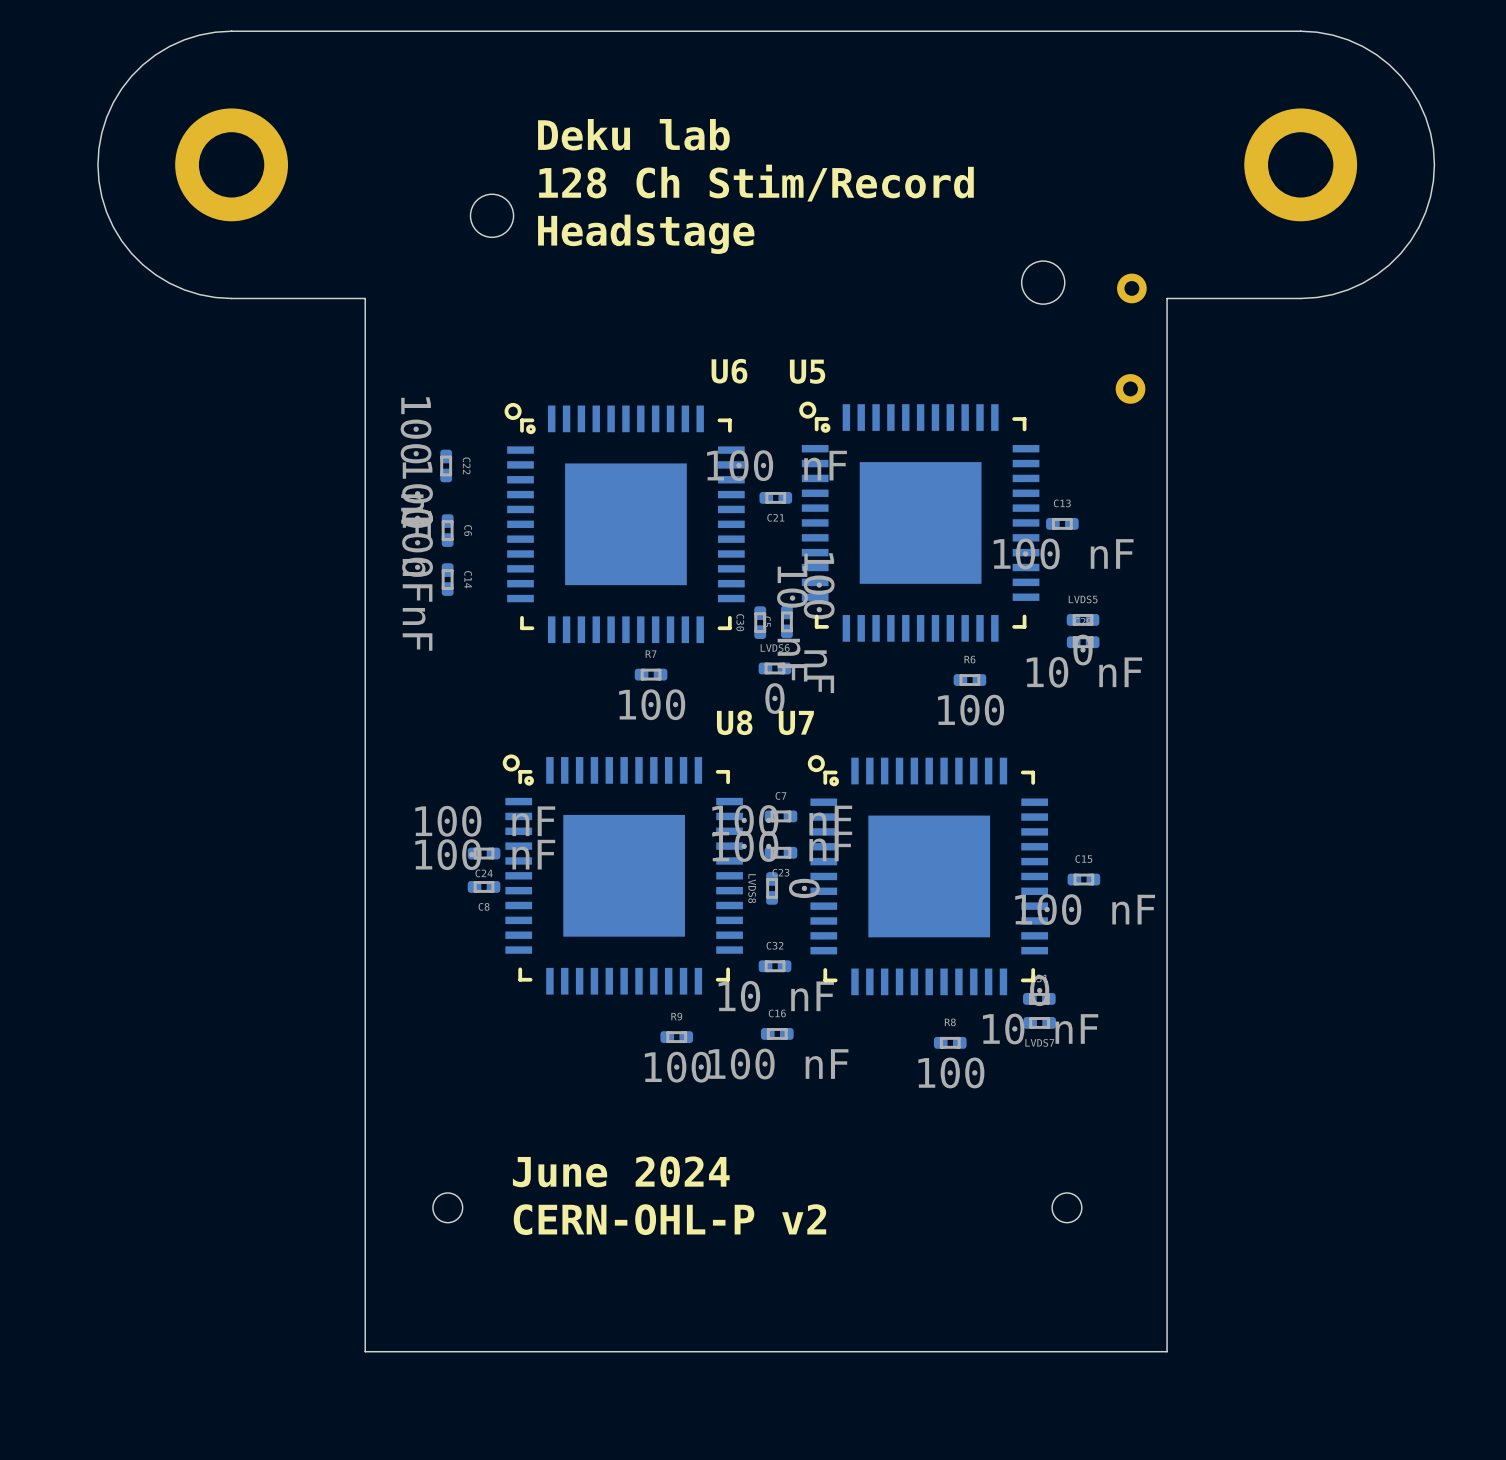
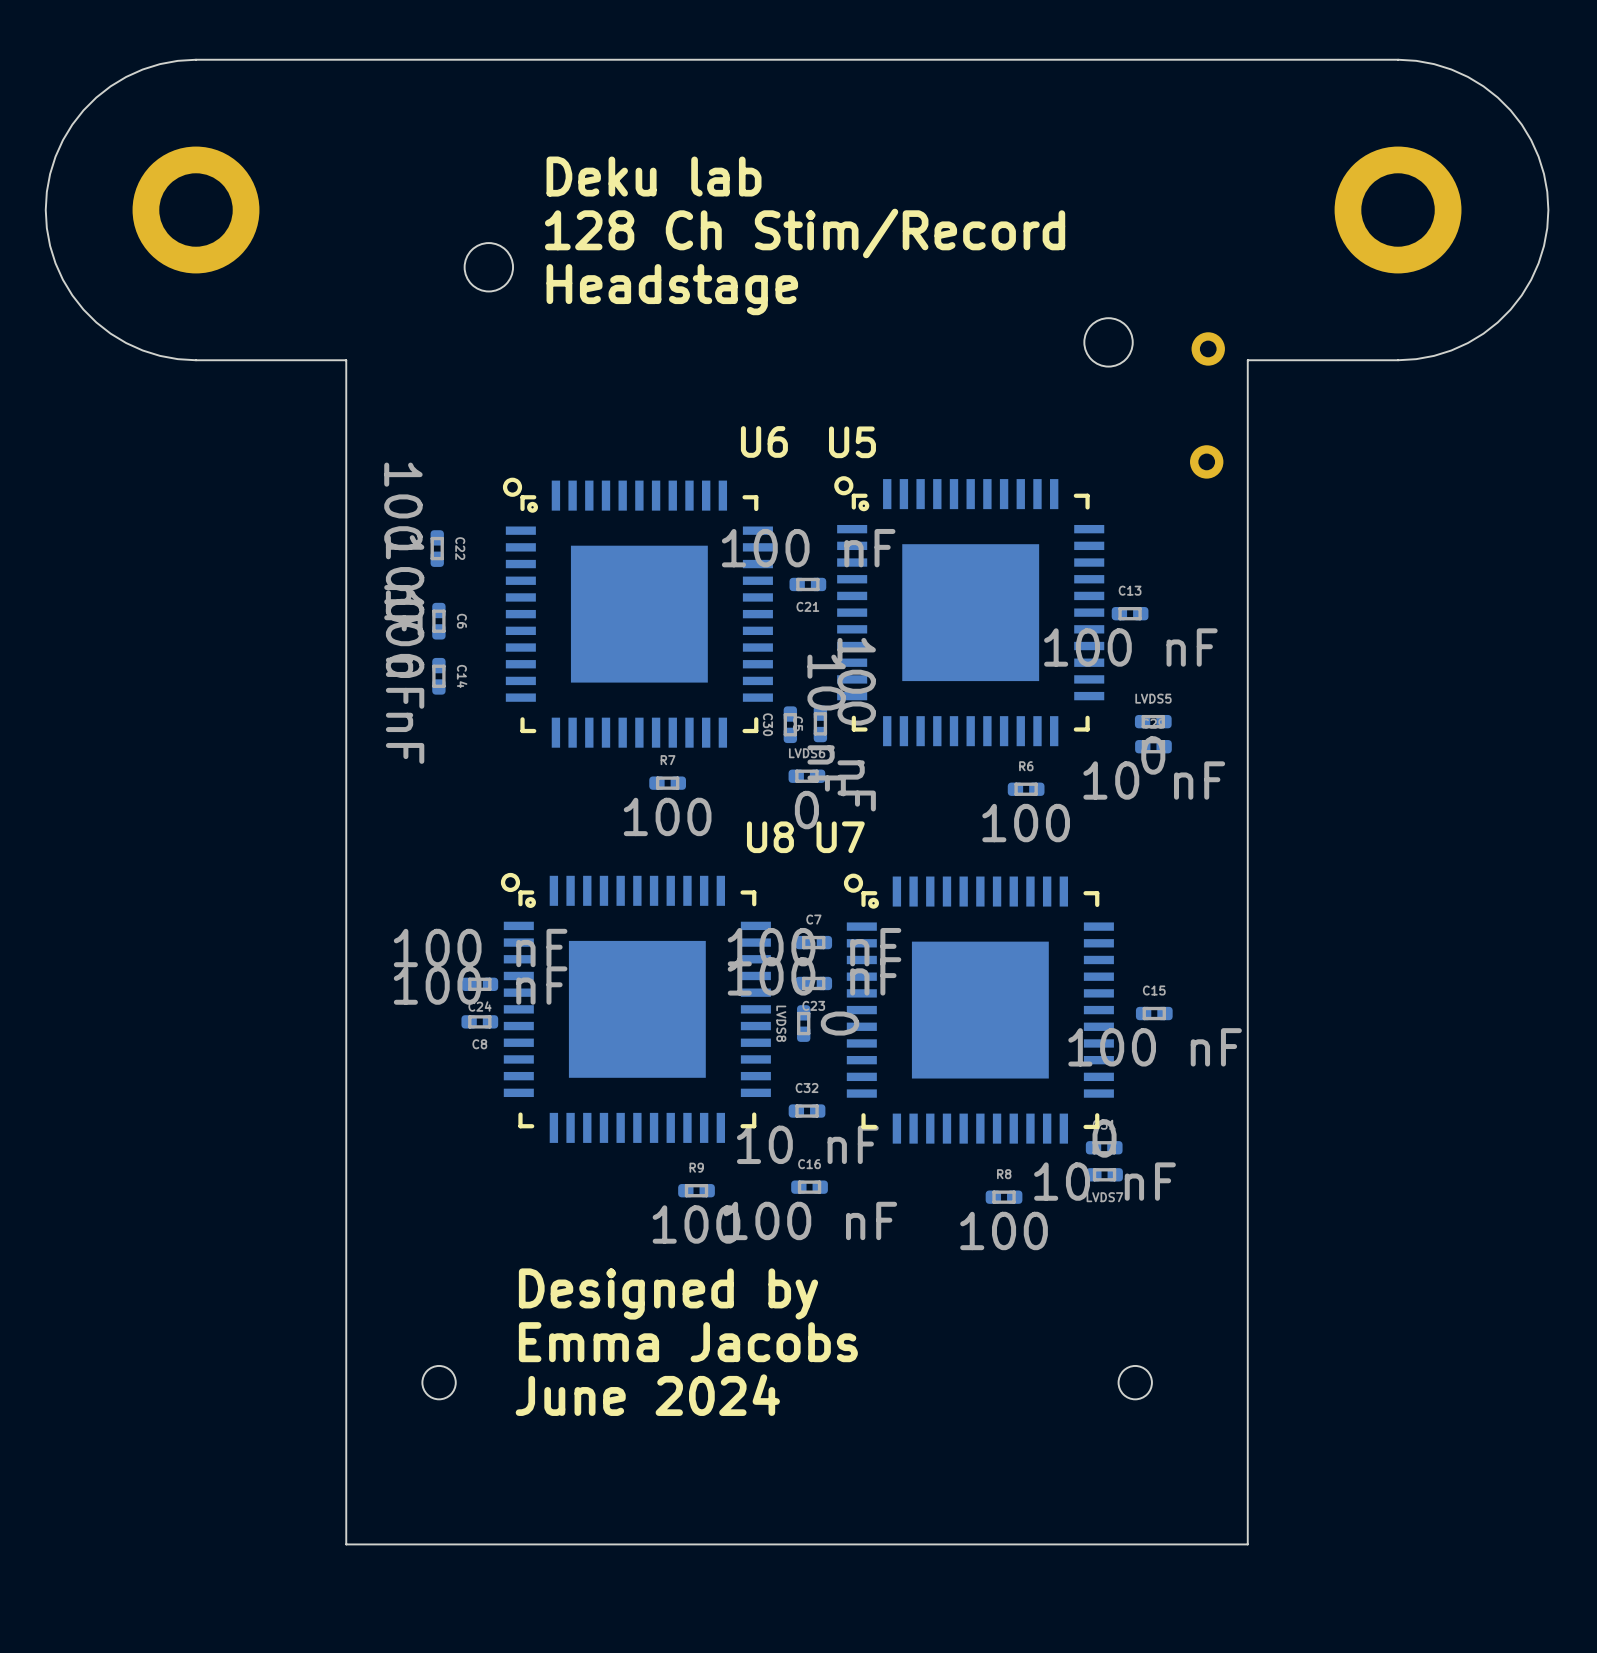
text: none -> Designed by (668, 1293)
text: June 2024 (621, 1171) -> Emma Jacobs (688, 1342)
text: CERN-OHL-P v2 (669, 1219) -> June 2024 (647, 1395)

